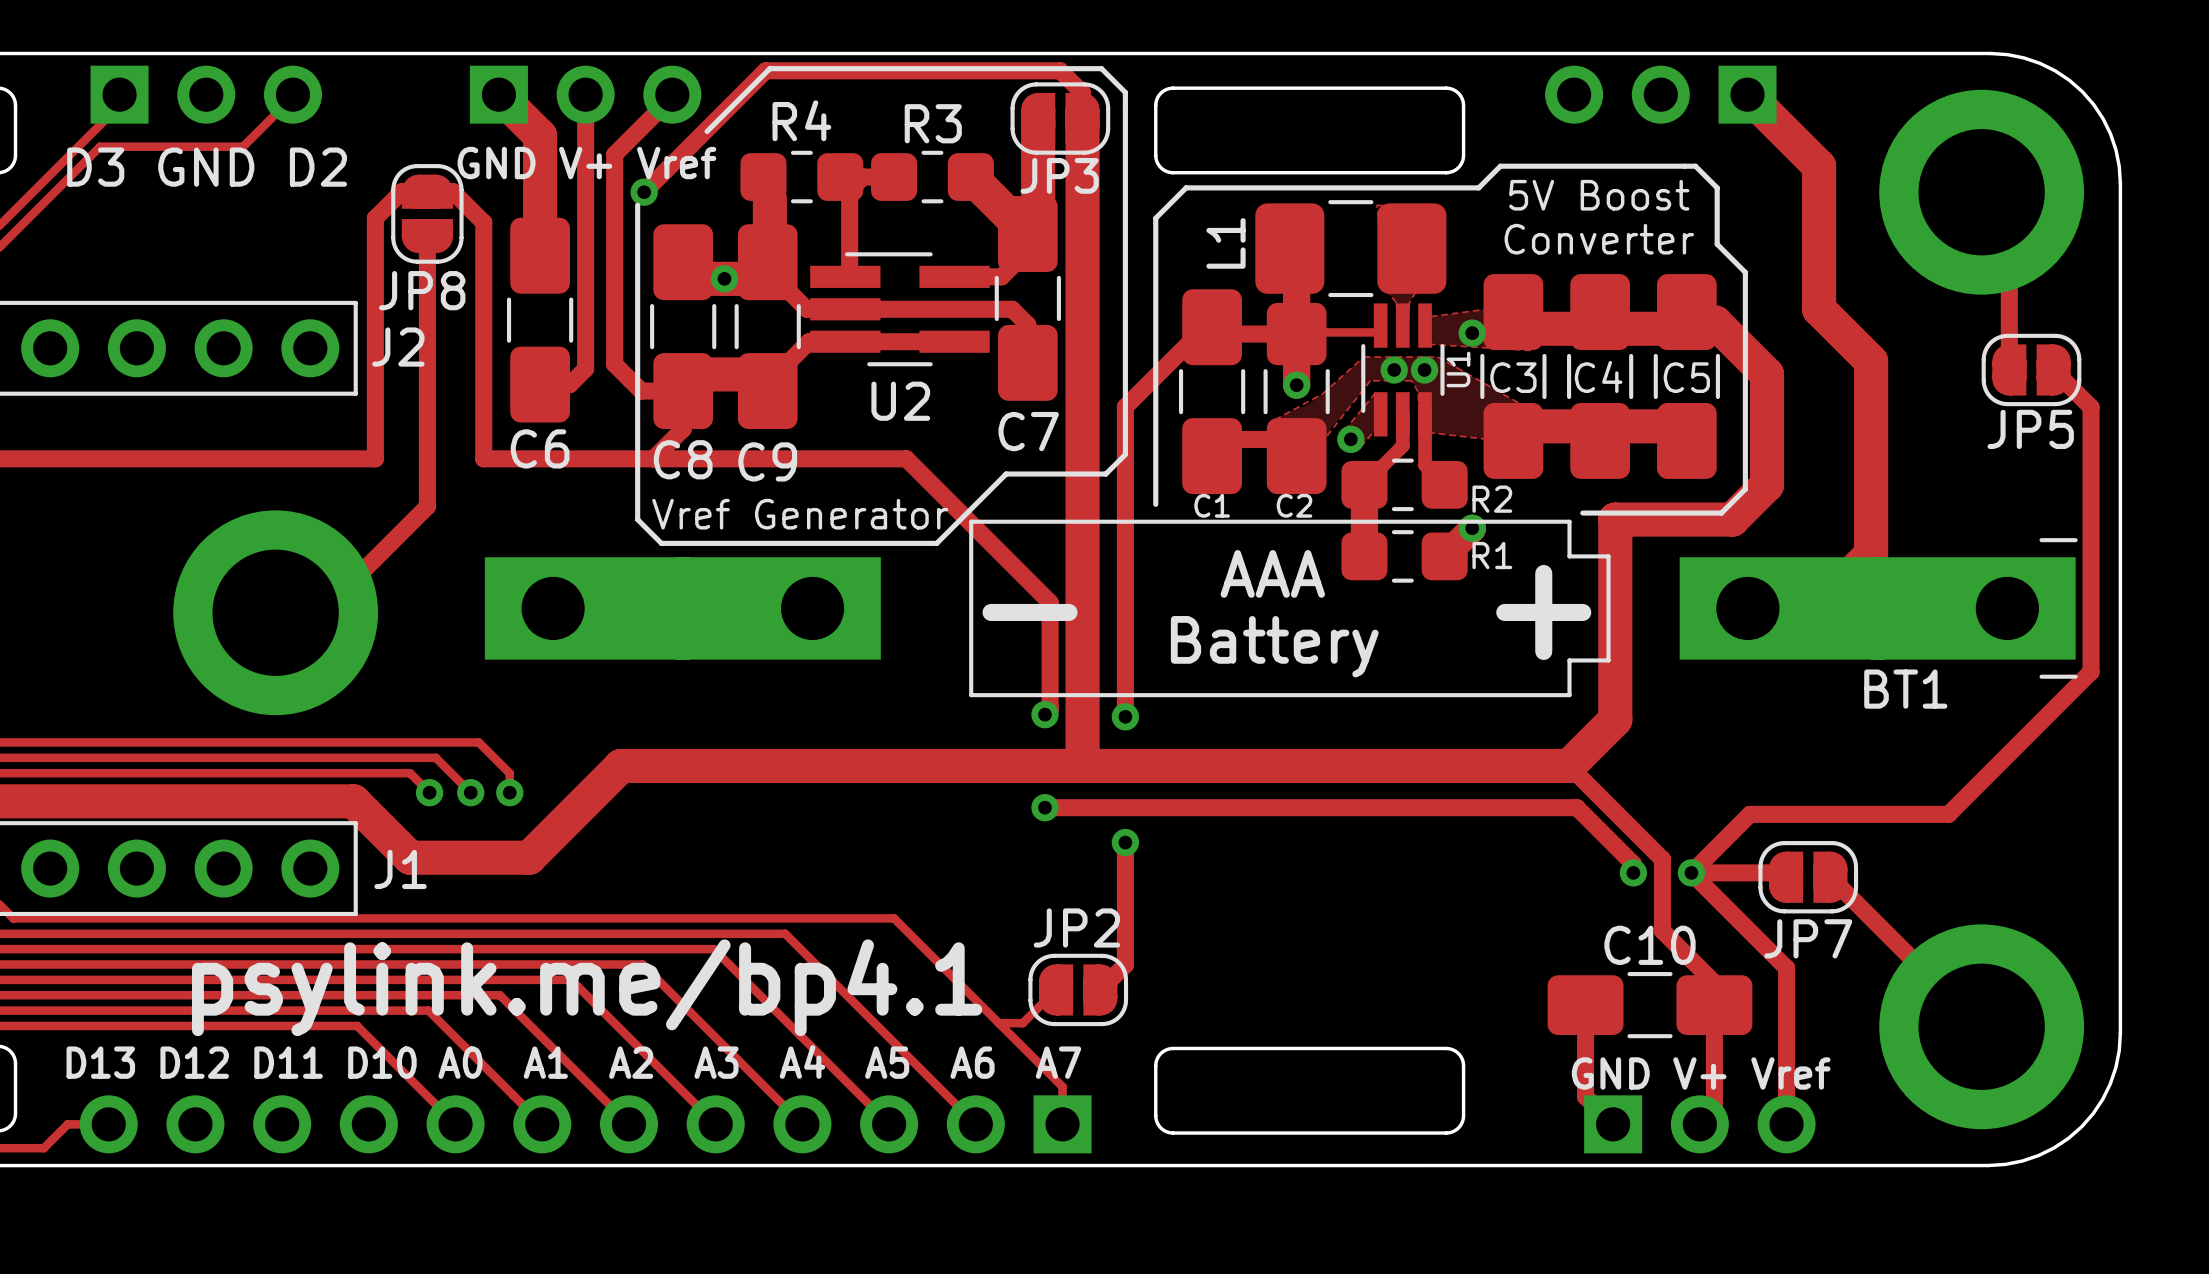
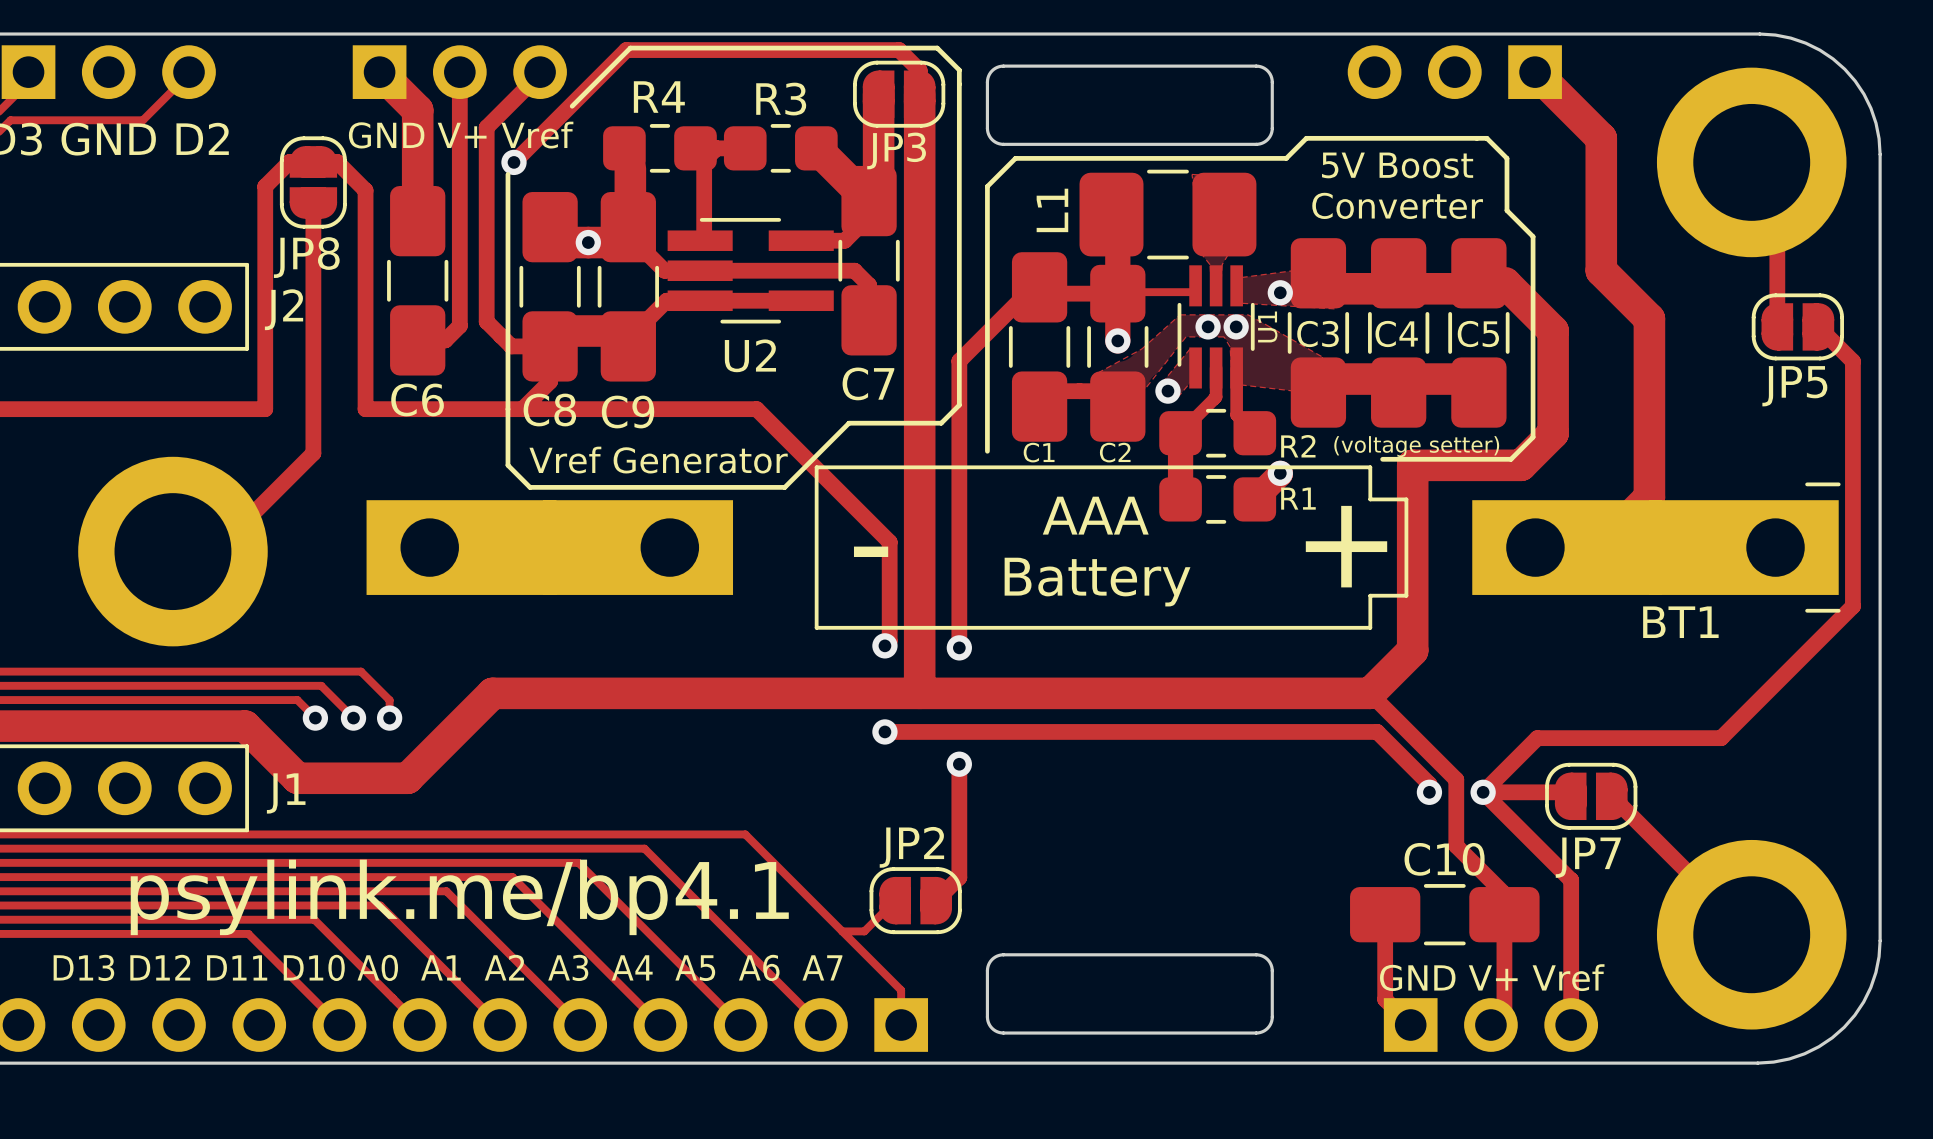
text: none -> (voltage setter) (1416, 446)

